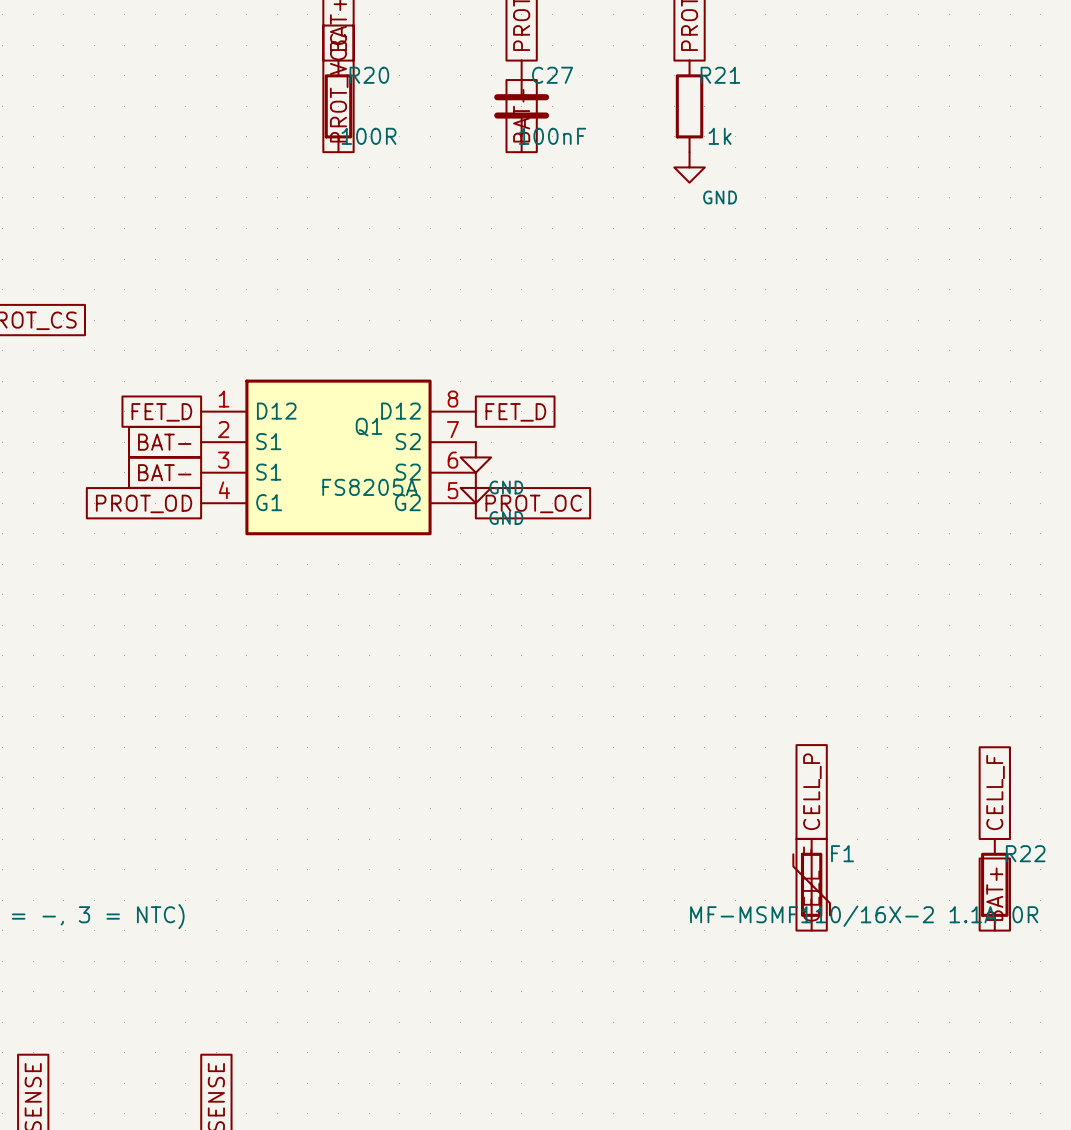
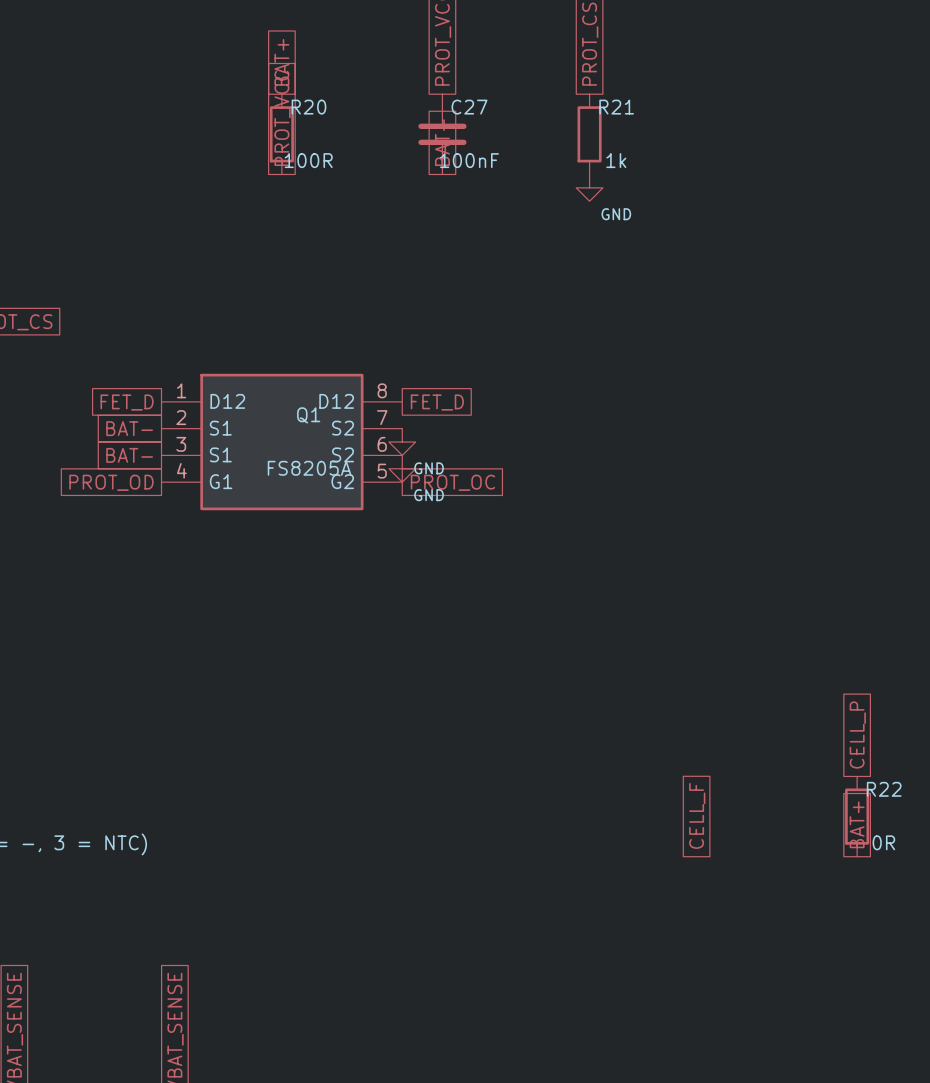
global label: CELL_P (812, 791) -> none
global label: CELL_F (995, 792) -> CELL_P (857, 735)
F1: MF-MSMF110/16X-2 1.1A (811, 884) -> none

